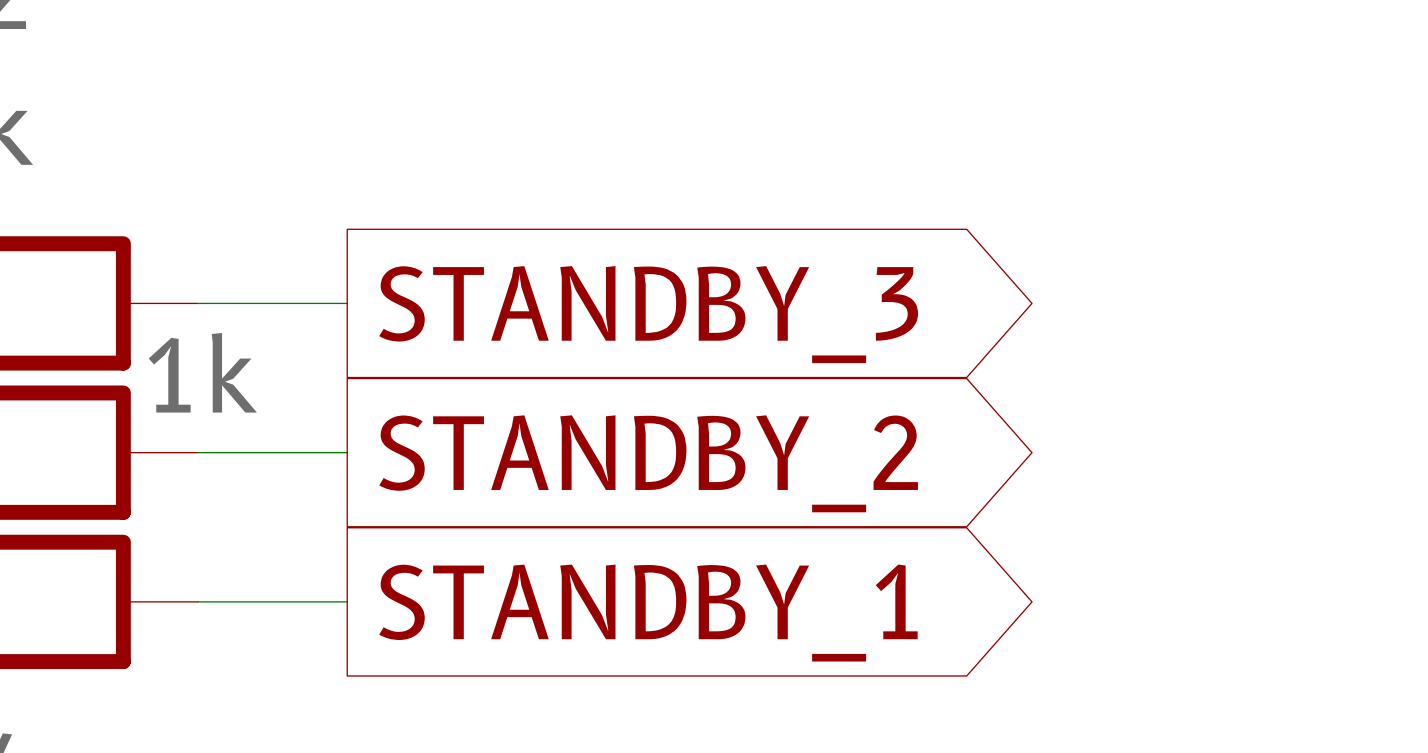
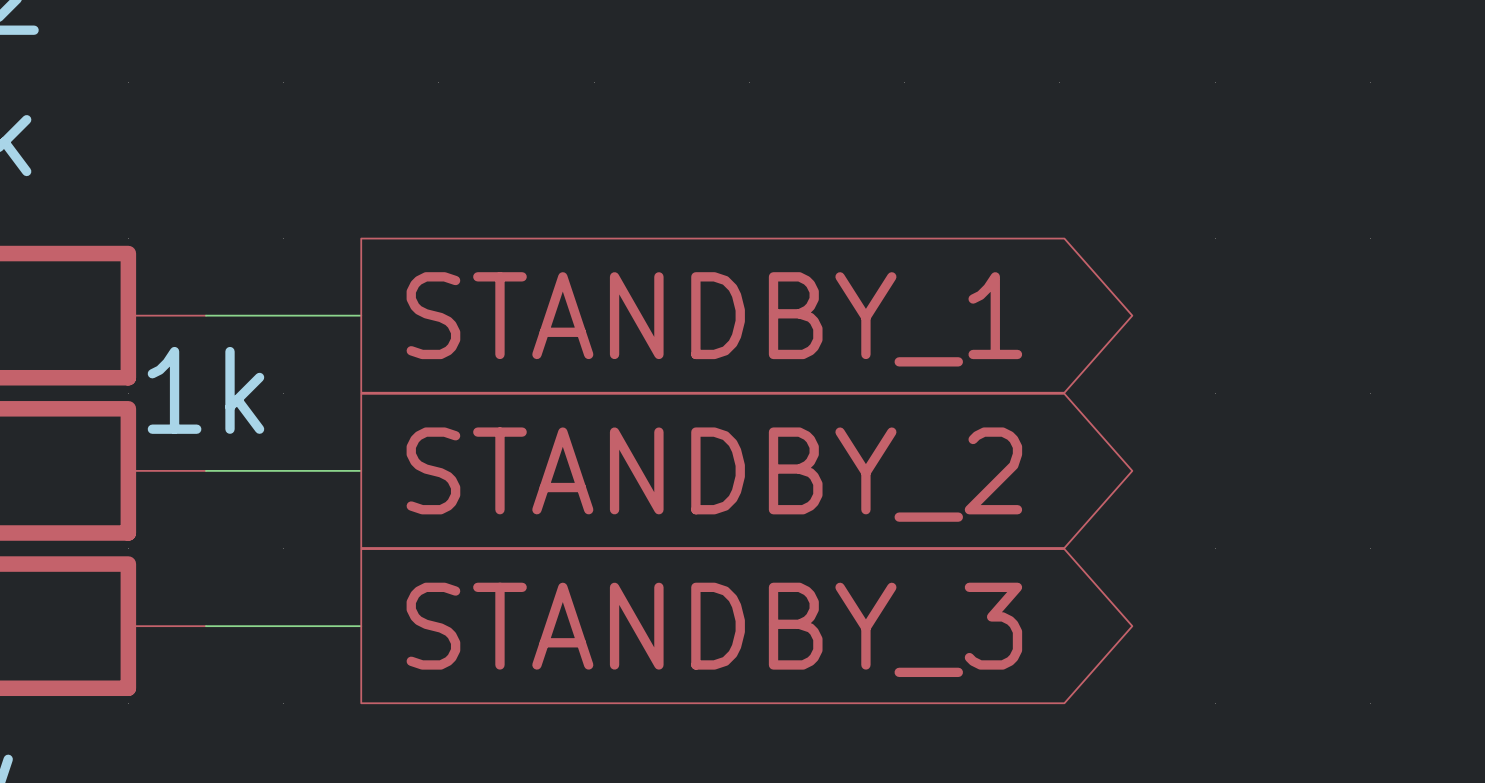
global label: STANDBY_3 (648, 314) -> STANDBY_1 (714, 319)
global label: STANDBY_1 (648, 613) -> STANDBY_3 (714, 629)

